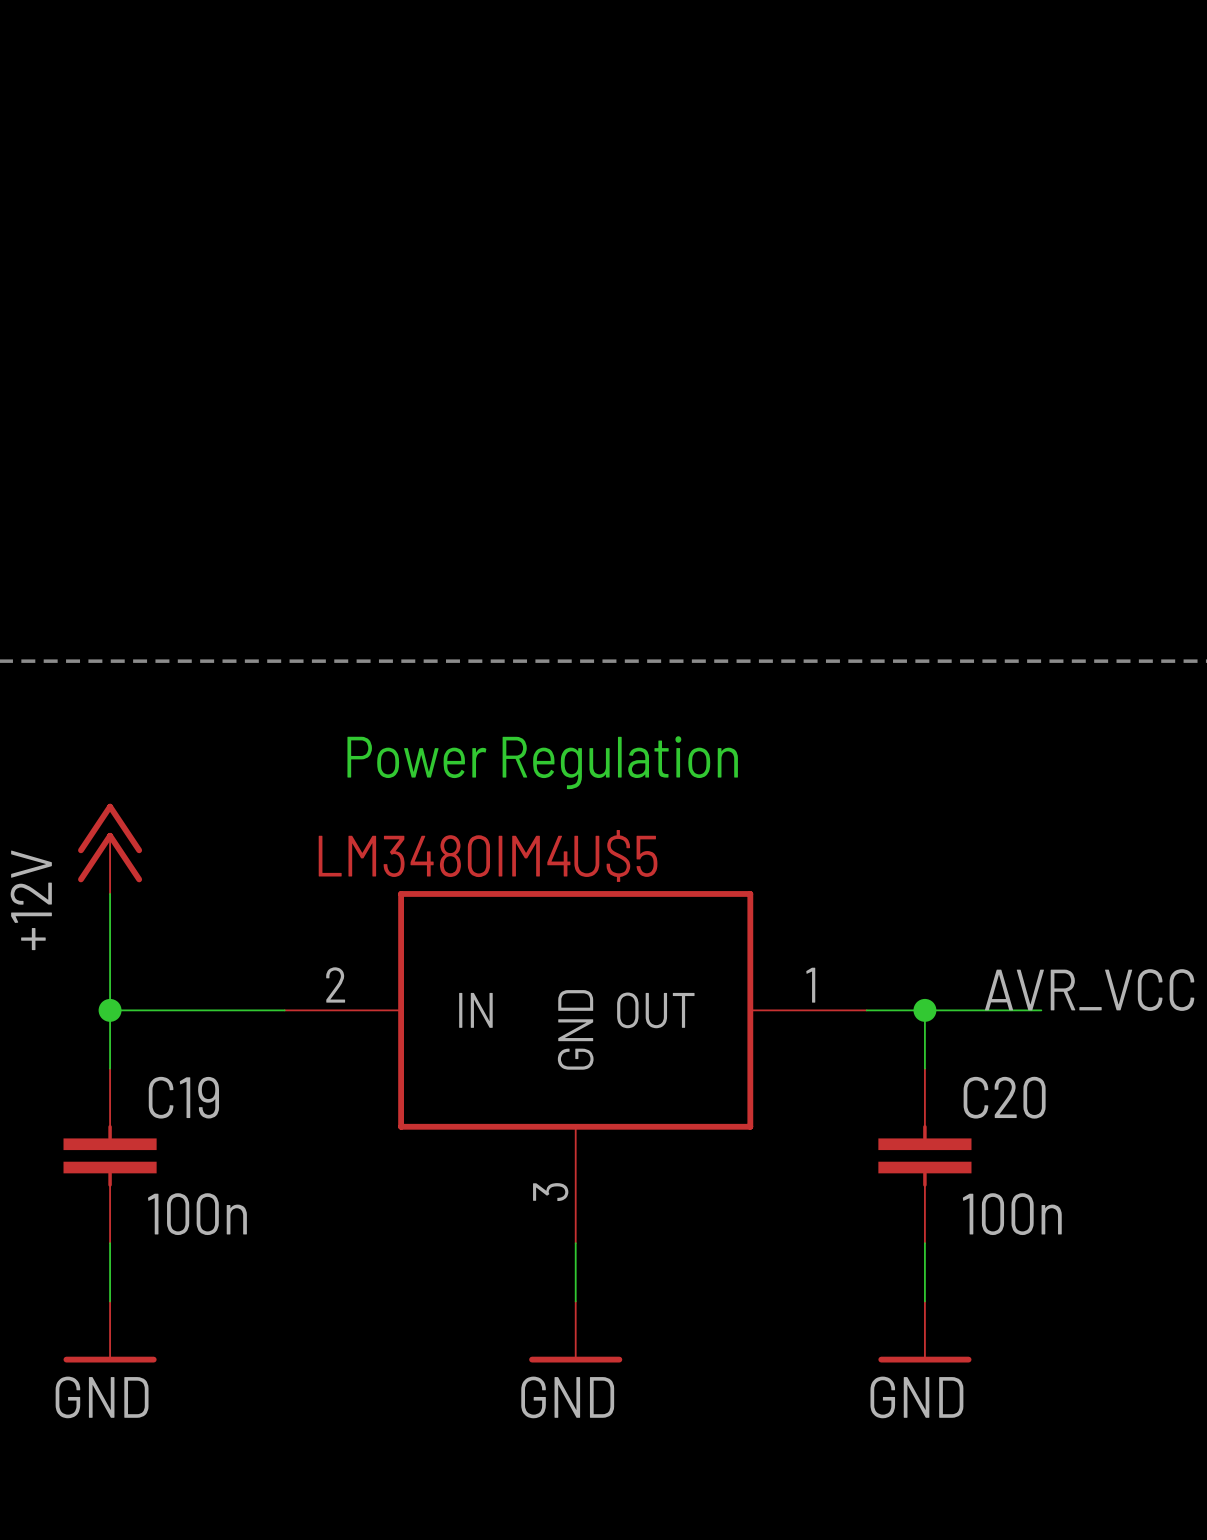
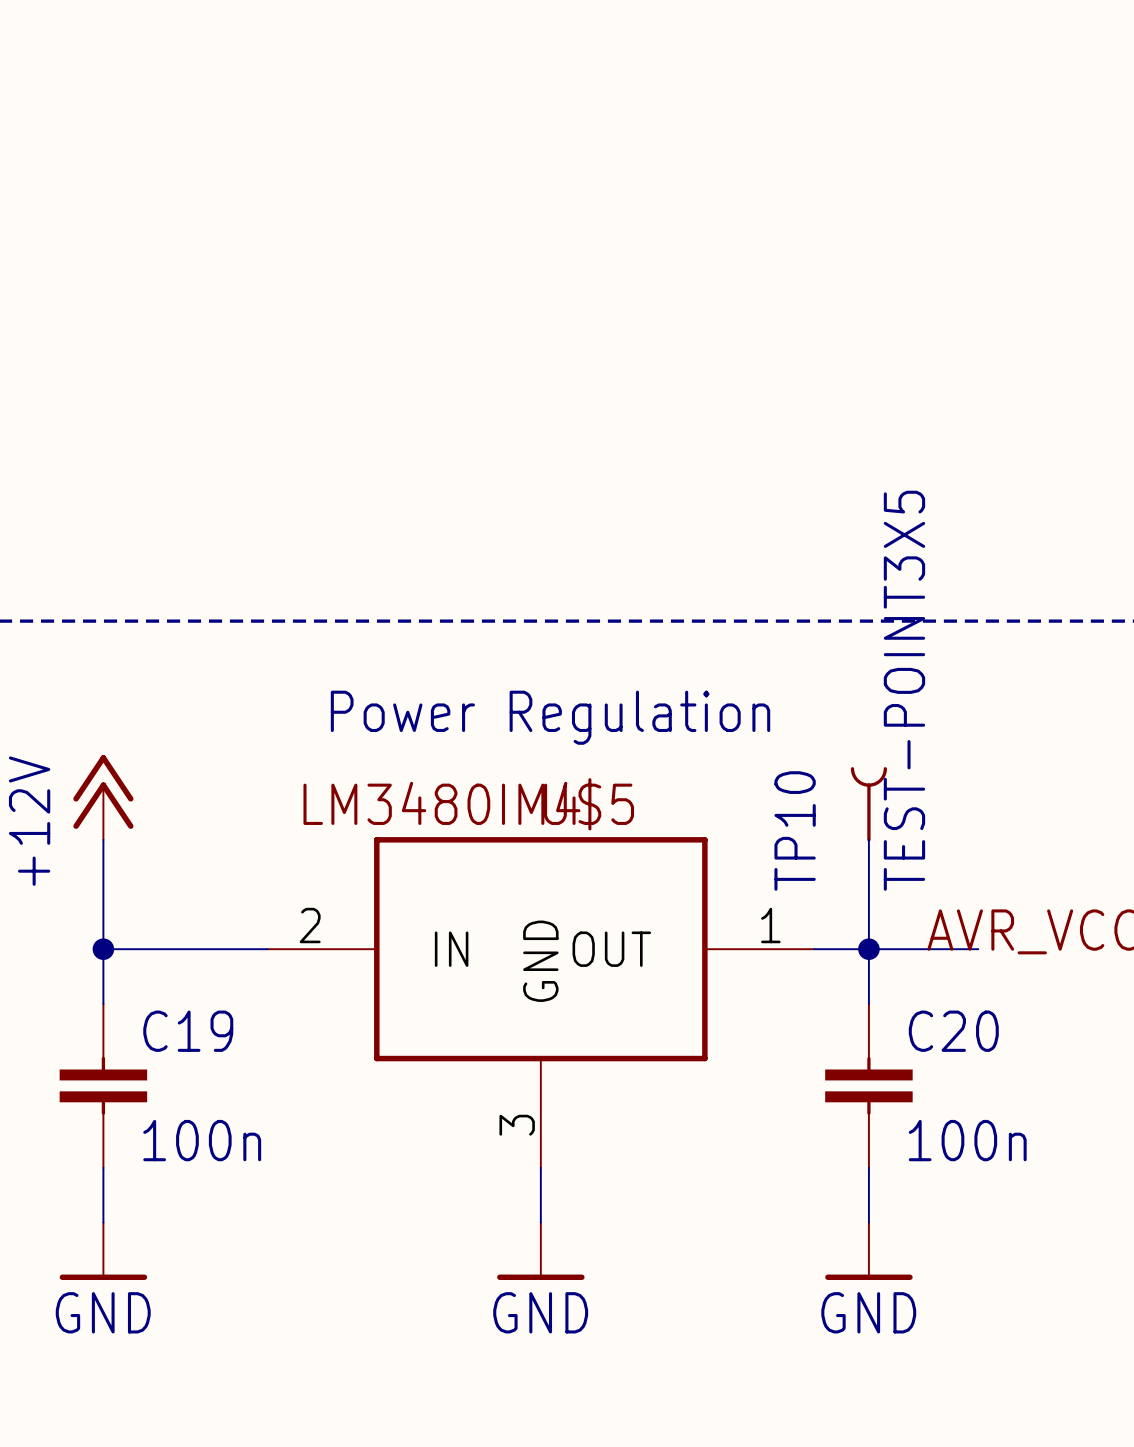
TP10: none -> TEST-POINT3X5 (868, 804)
wire: none -> (868, 839) (868, 949)

